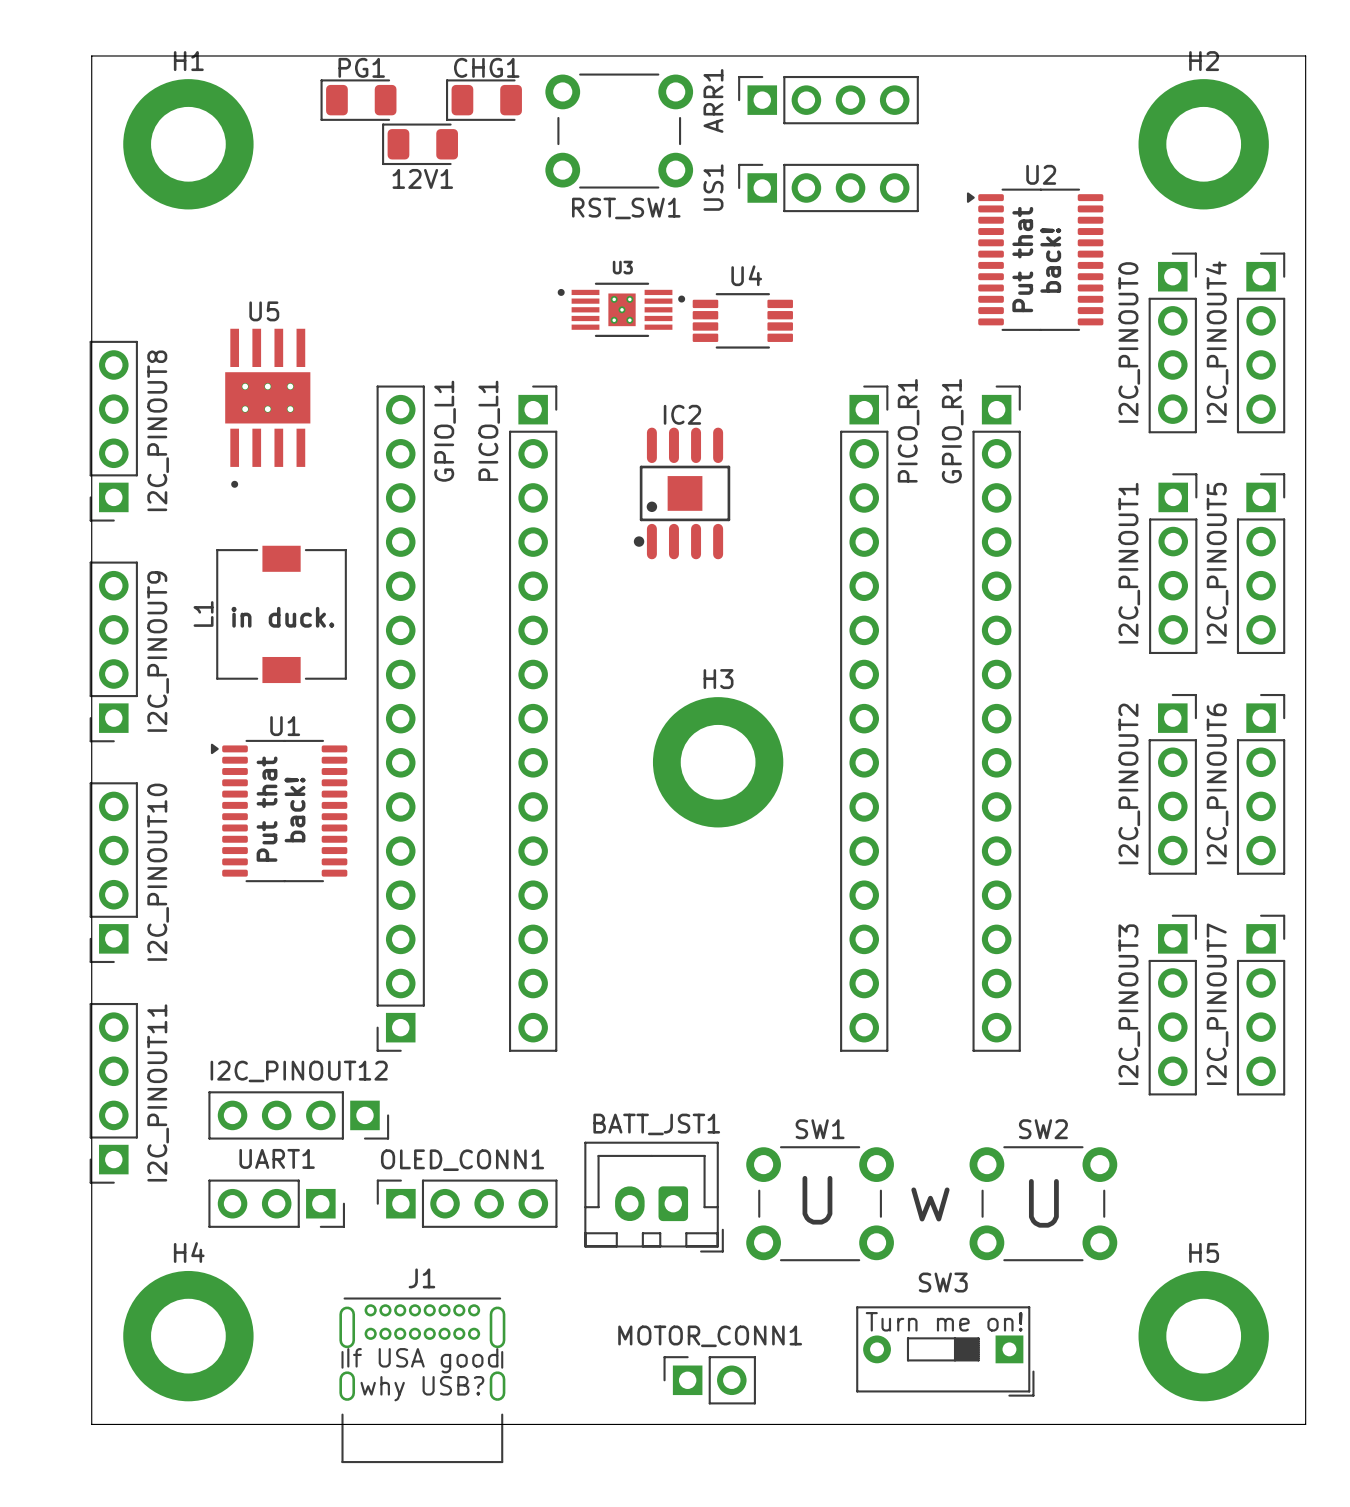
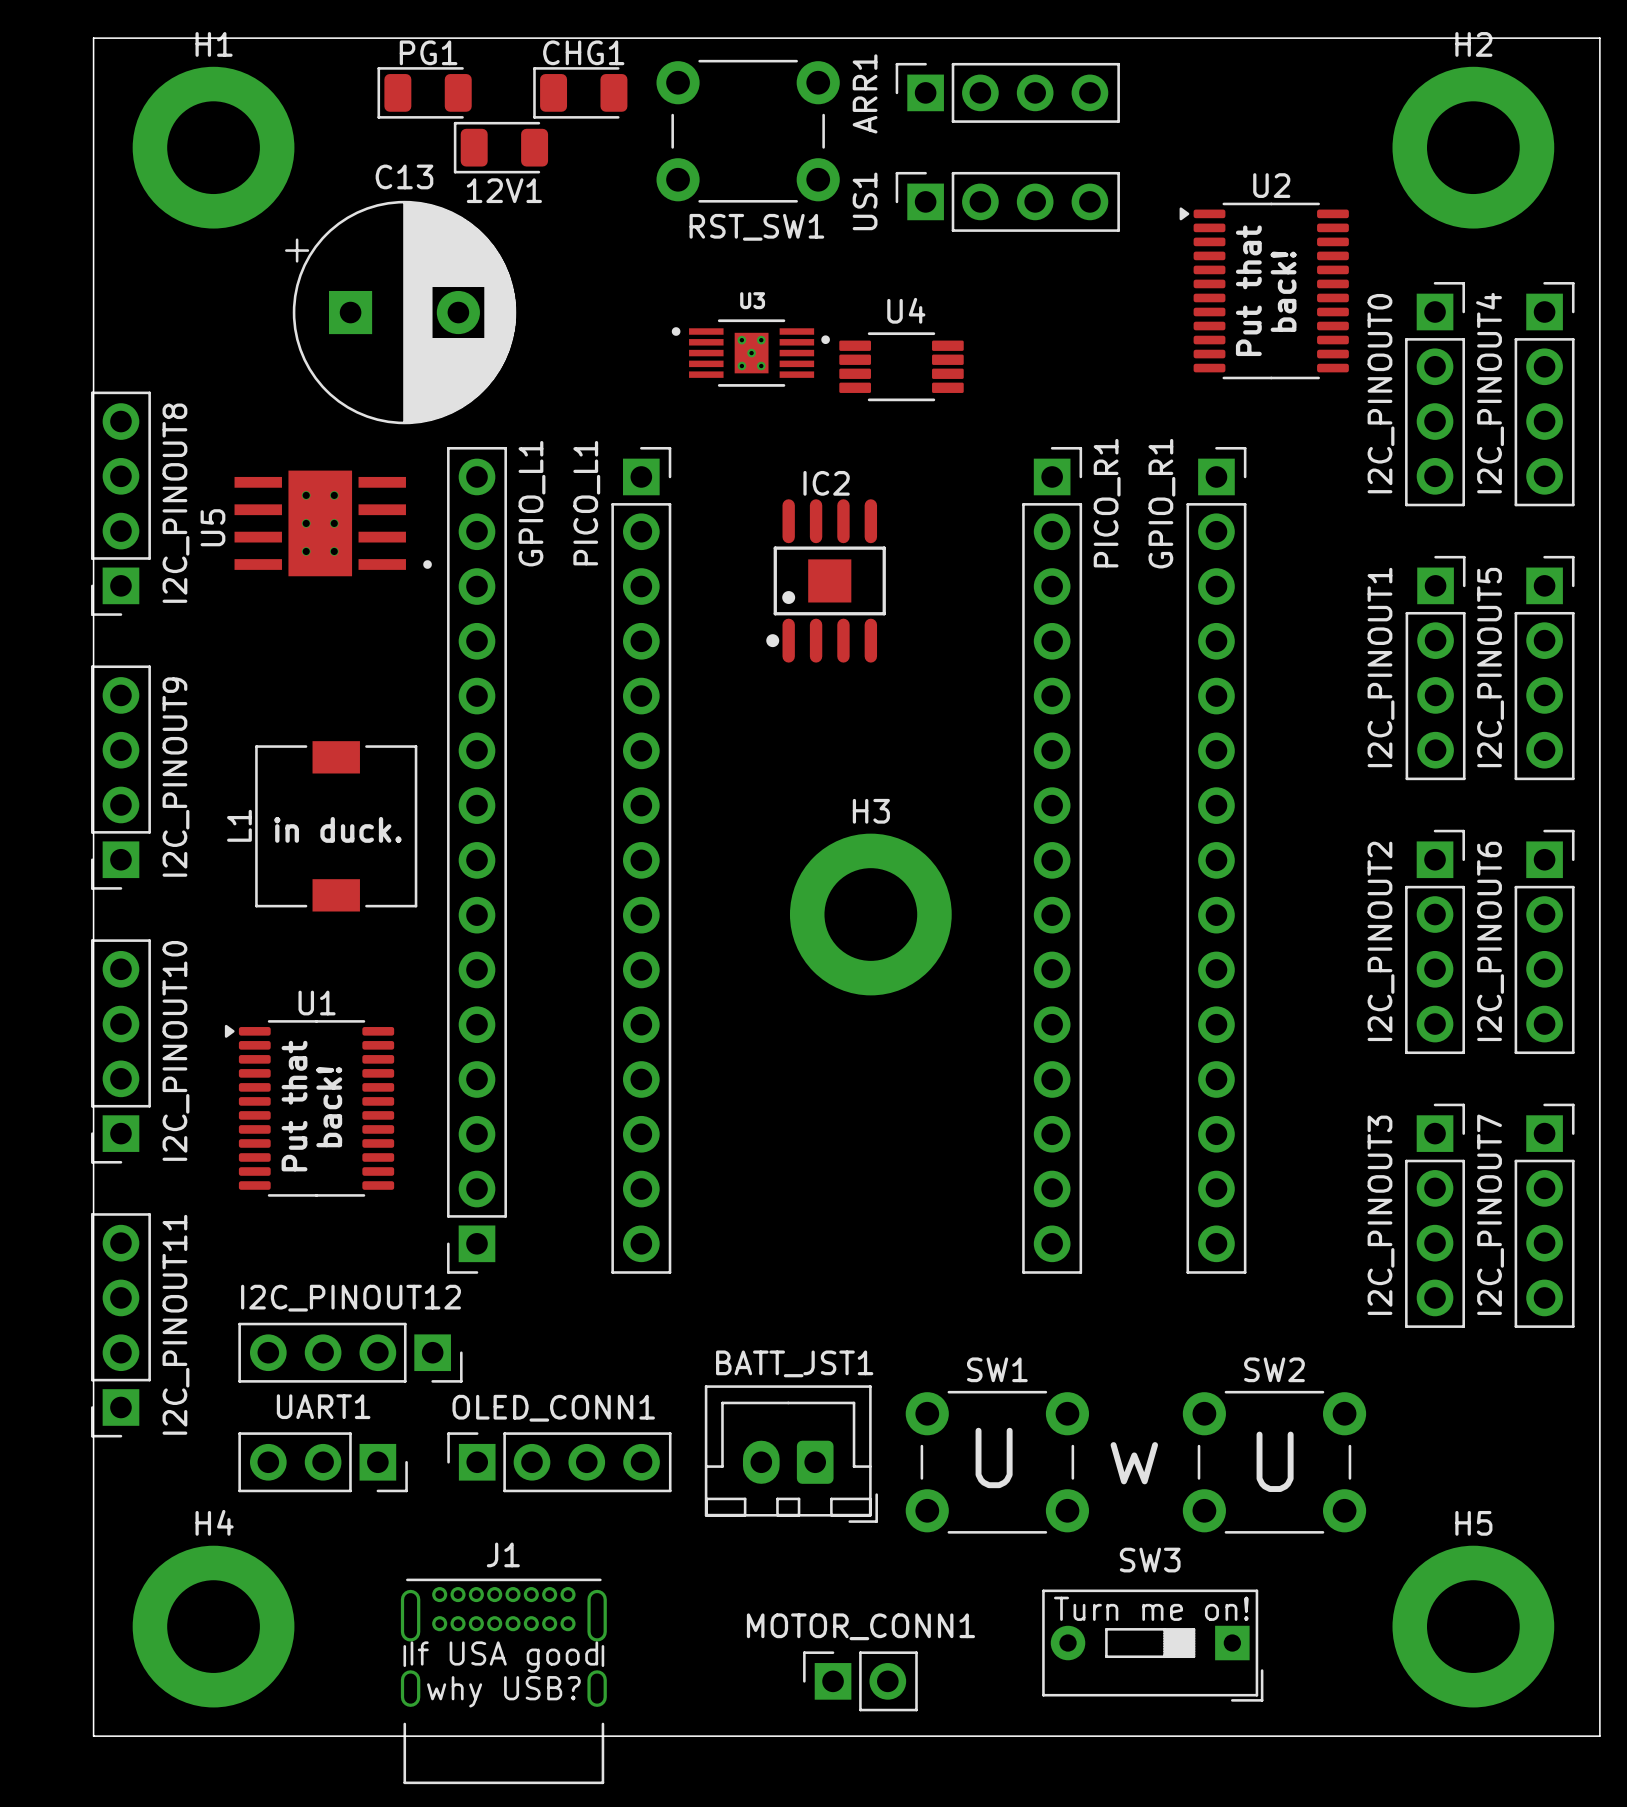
C13: none -> (400, 312)
U5 rotation: 0° (267, 408) -> 90° counterclockwise (333, 523)
L1 position: (281, 614) -> (336, 826)
text position: in duck. (282, 617) -> in duck. (337, 829)
text position: Put that (267, 809) -> Put that (294, 1106)
text position: back! (295, 809) -> back! (329, 1107)
U1 position: (279, 811) -> (309, 1108)

